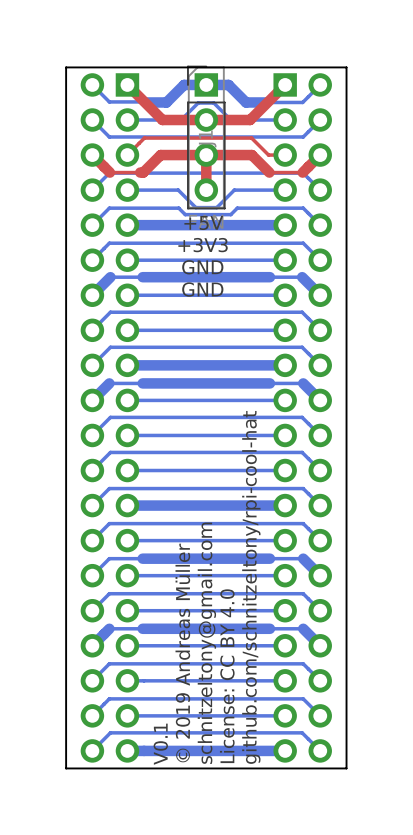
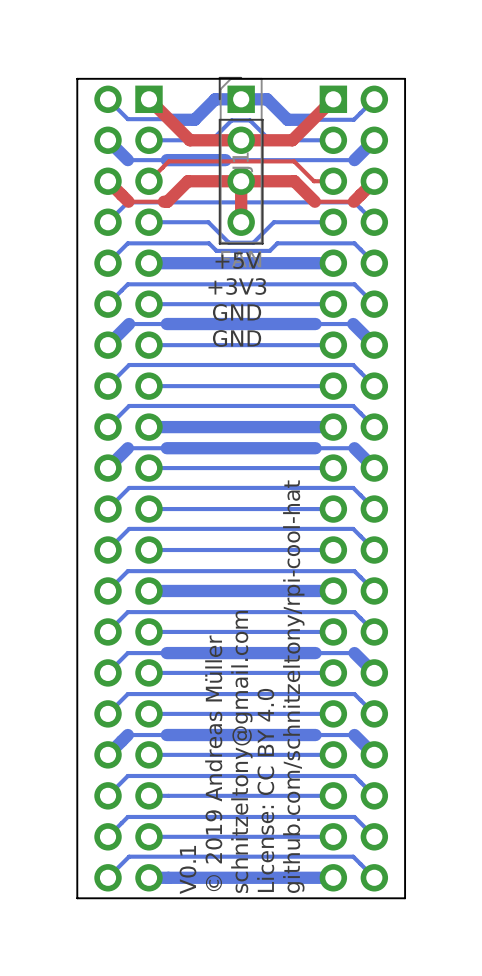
bottom track width: thin (92, 120) (109, 136) -> thick (108, 140) (127, 160)
bottom track width: thin (320, 120) (303, 136) -> thick (374, 140) (354, 160)
bottom track width: thin (142, 136) (192, 136) -> thick (166, 160) (225, 160)

